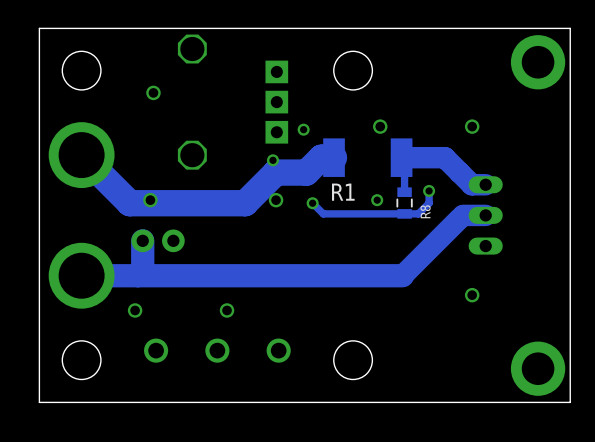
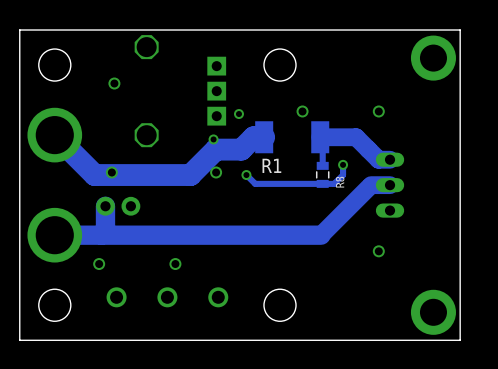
via: (377, 200) -> none

